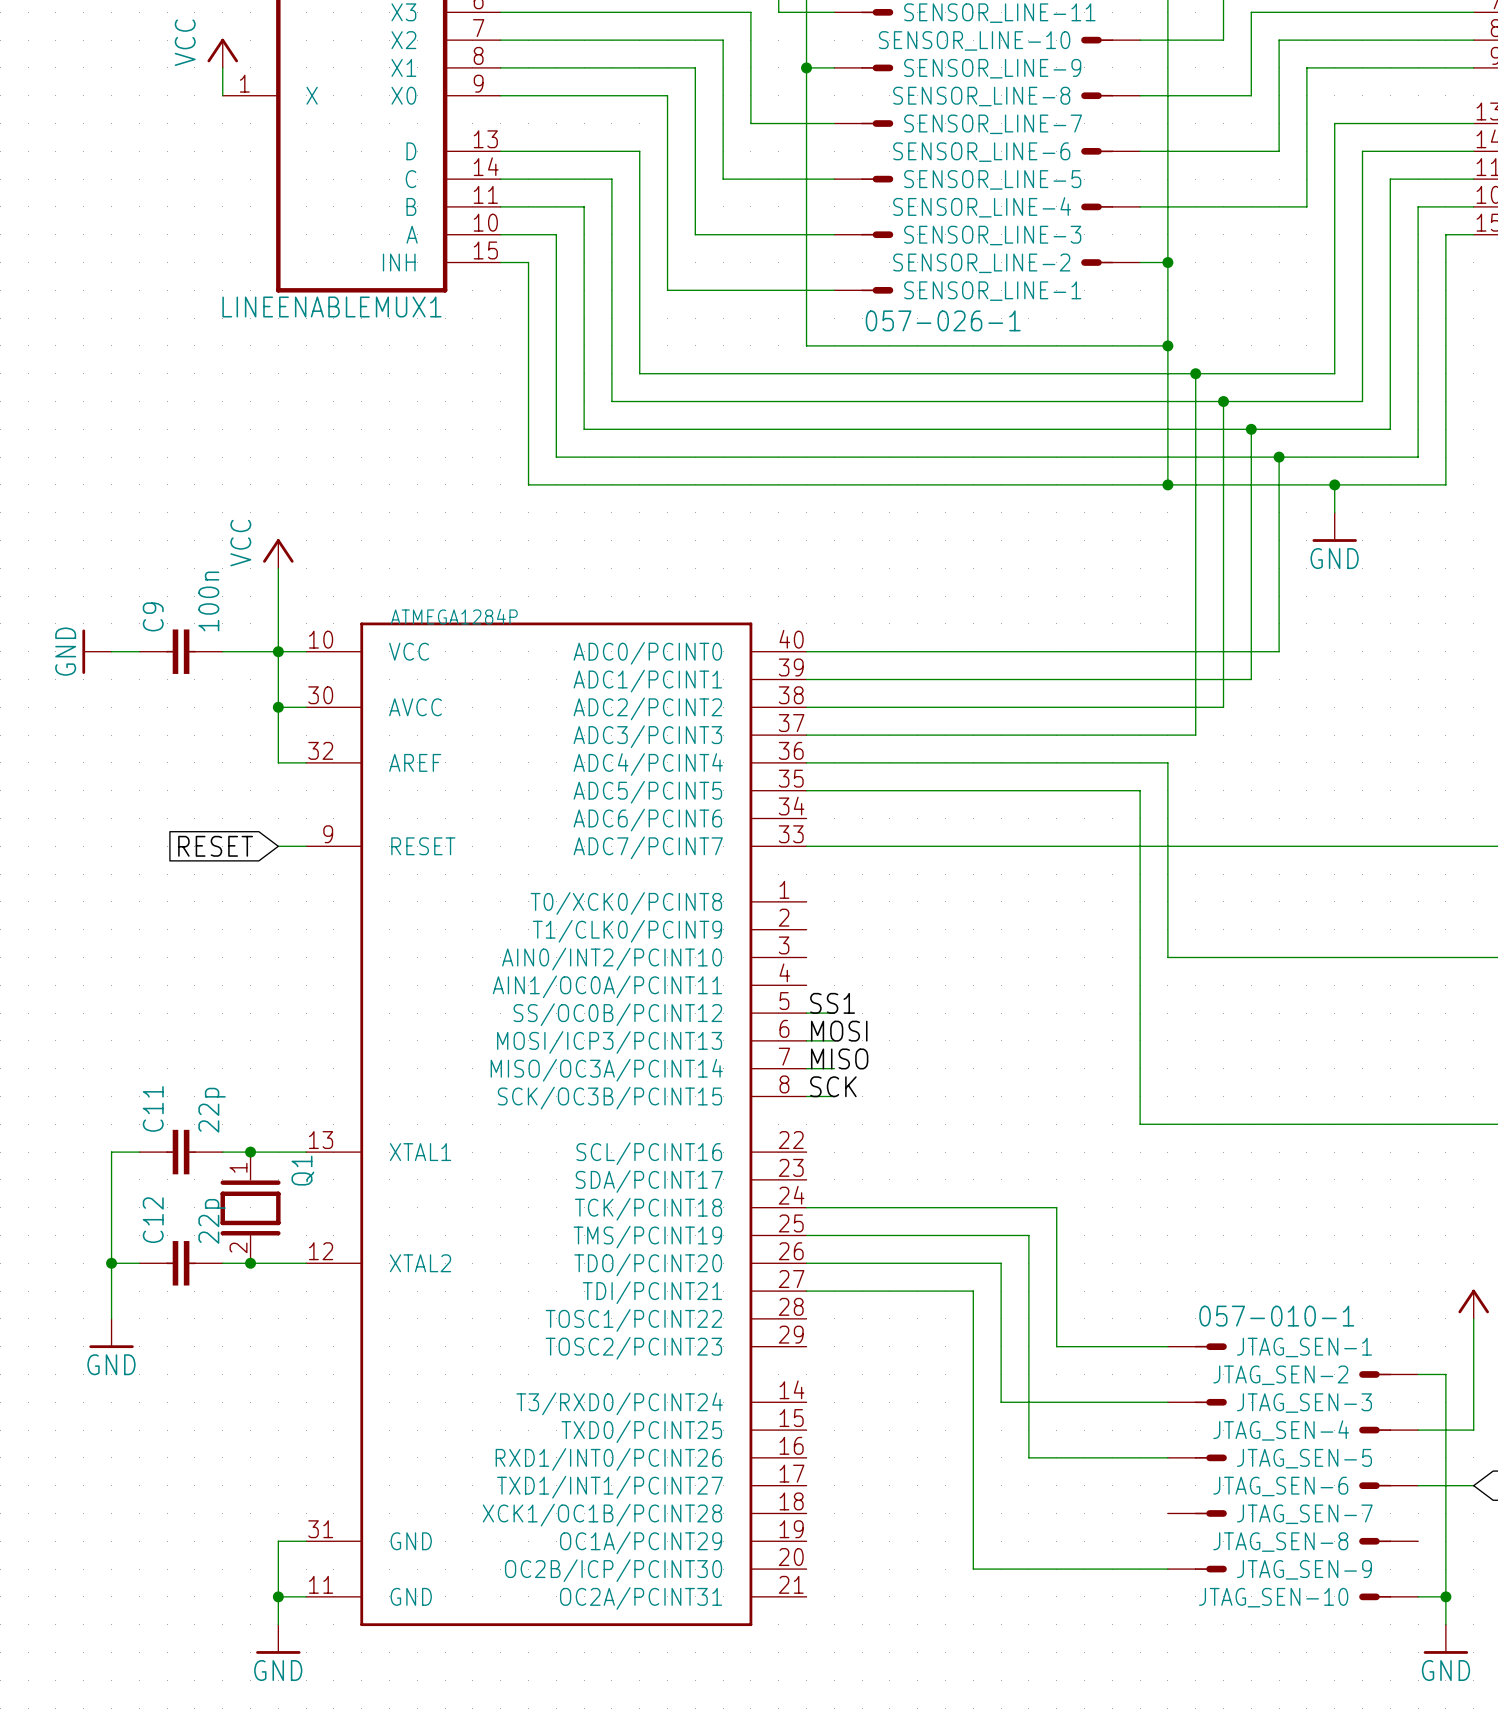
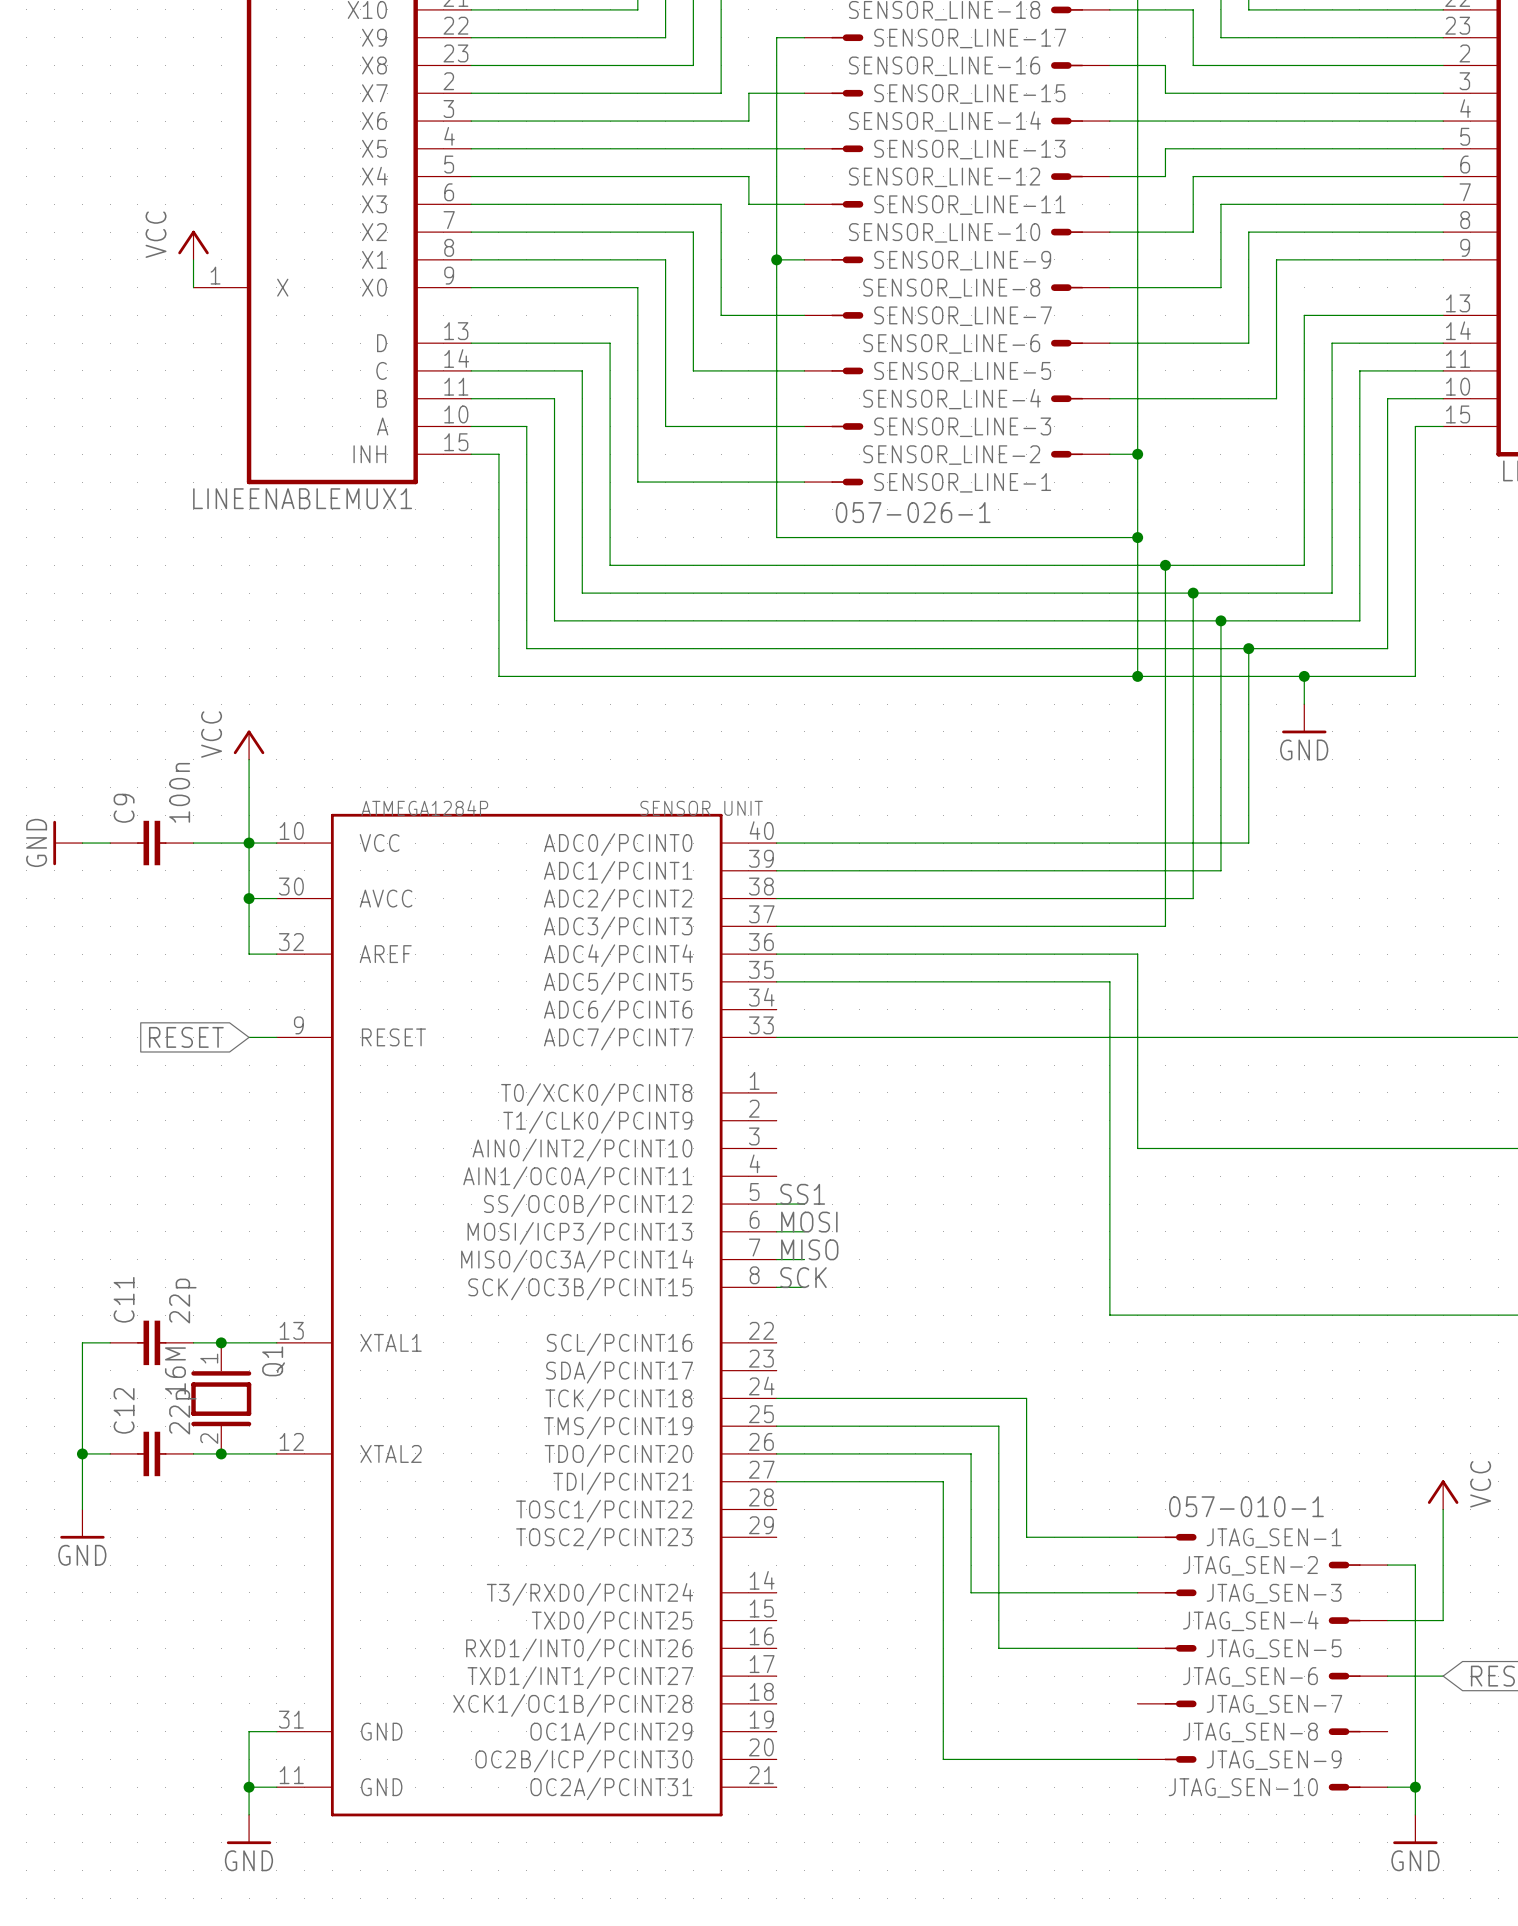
ATMEGA1284P value: none -> SENSOR UNIT (701, 808)
Q1 value: none -> 16M (175, 1370)

